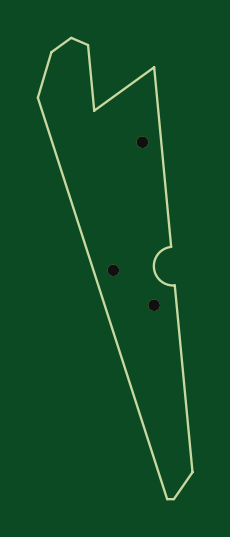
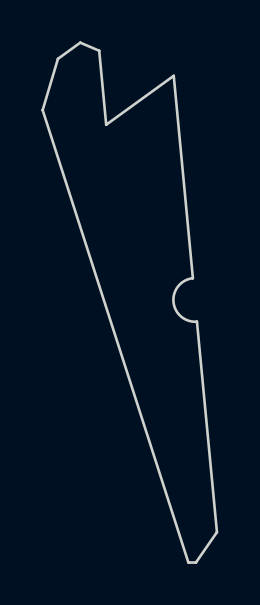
part: (142, 142) -> none
part: (113, 270) -> none
part: (154, 305) -> none

